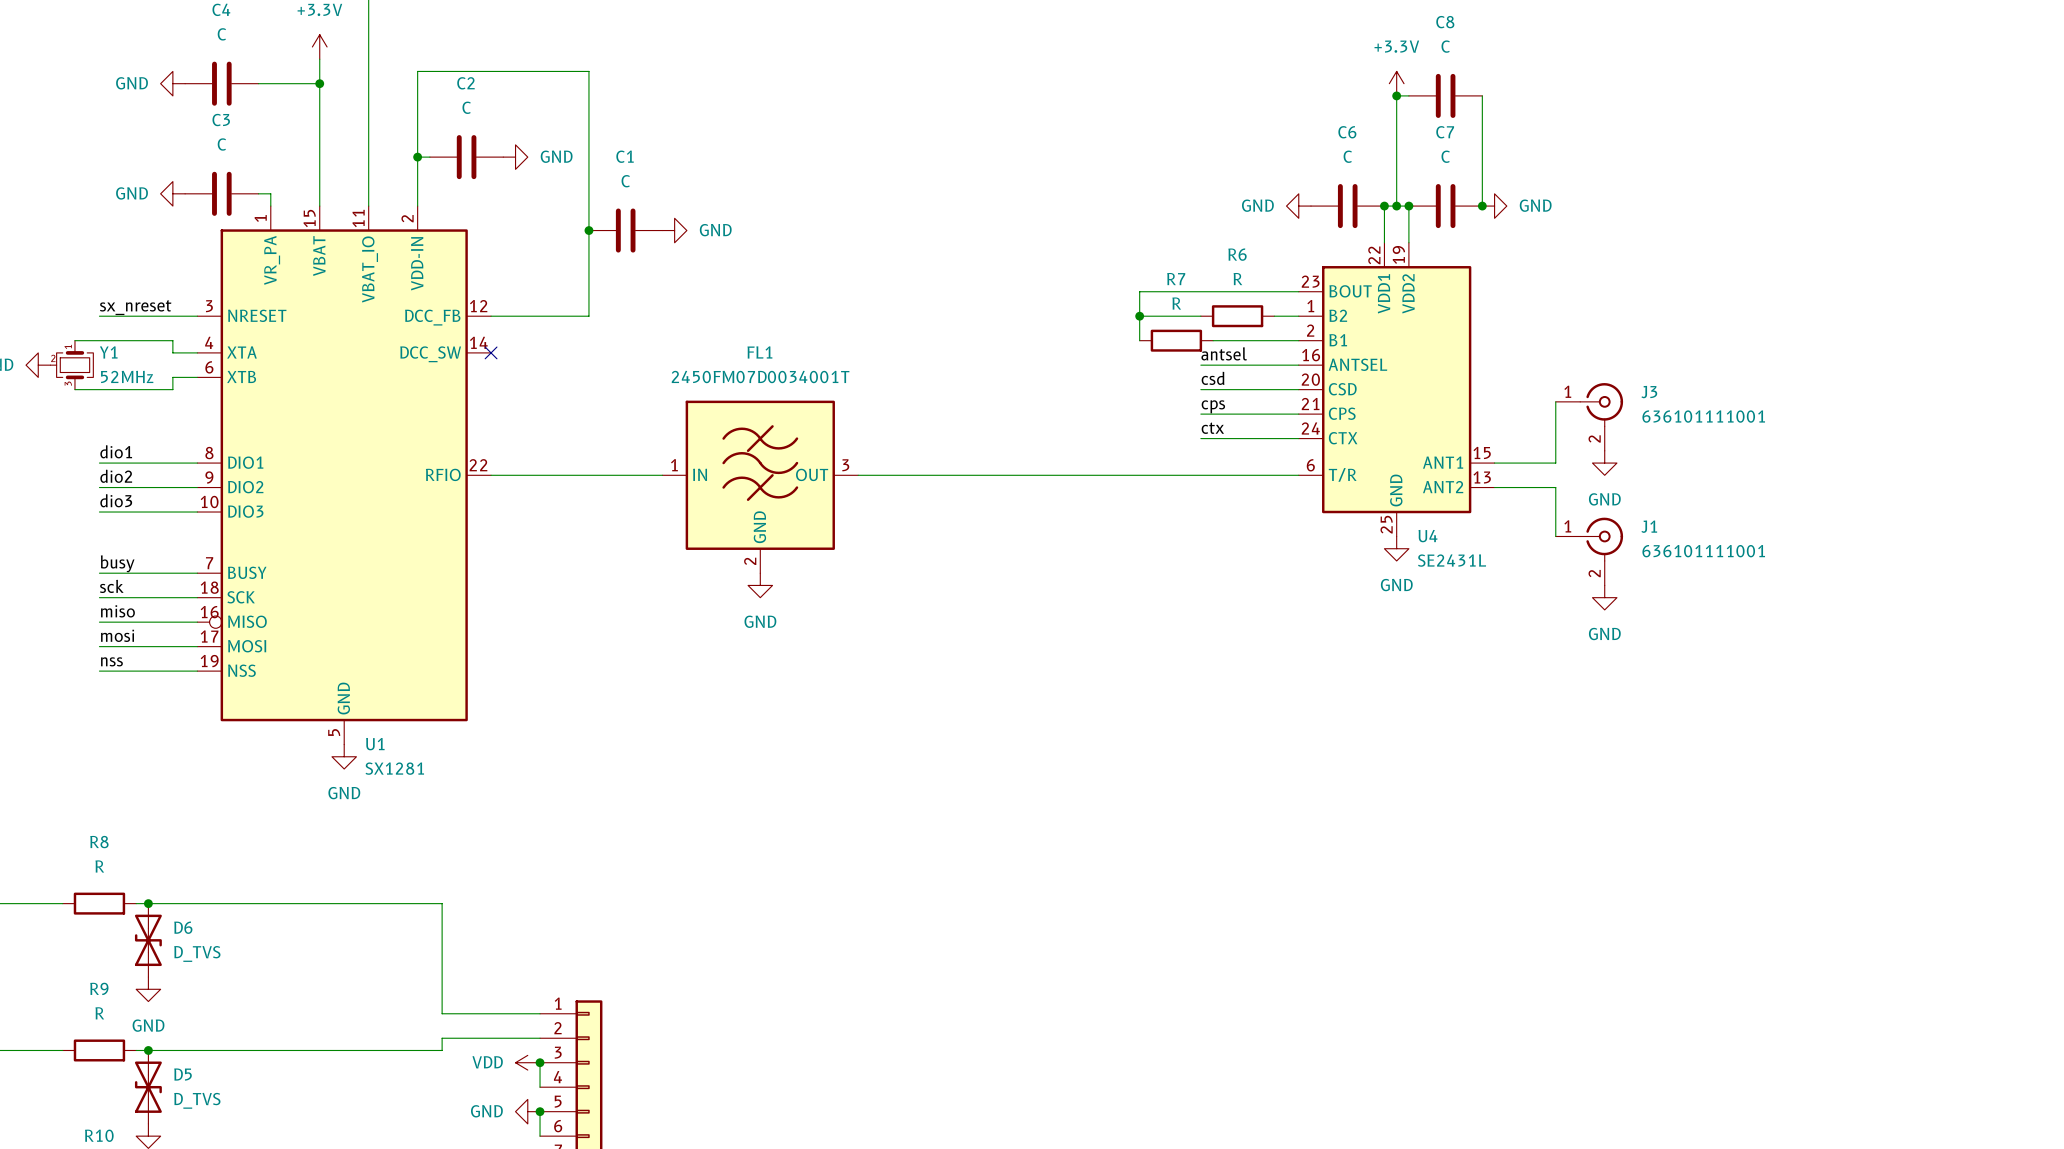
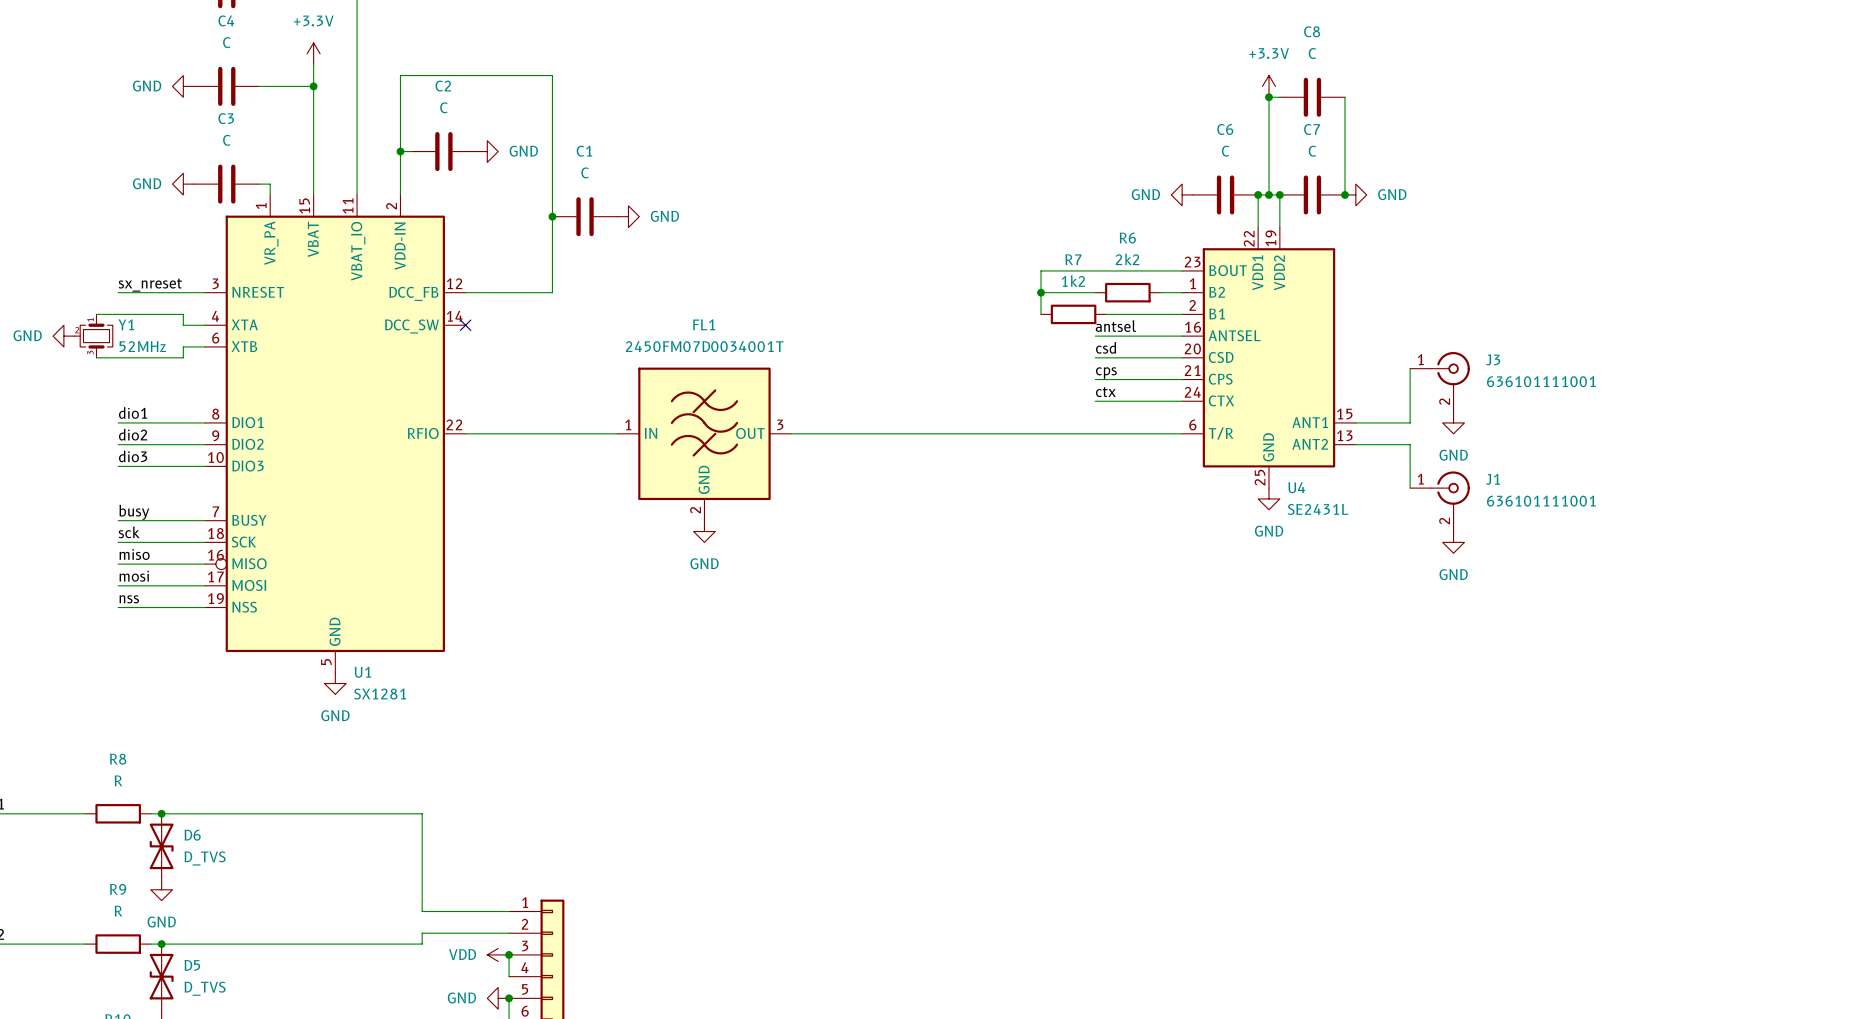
R6 value: R (1237, 279) -> 2k2 (1127, 259)
R7 value: R (1176, 303) -> 1k2 (1073, 281)

